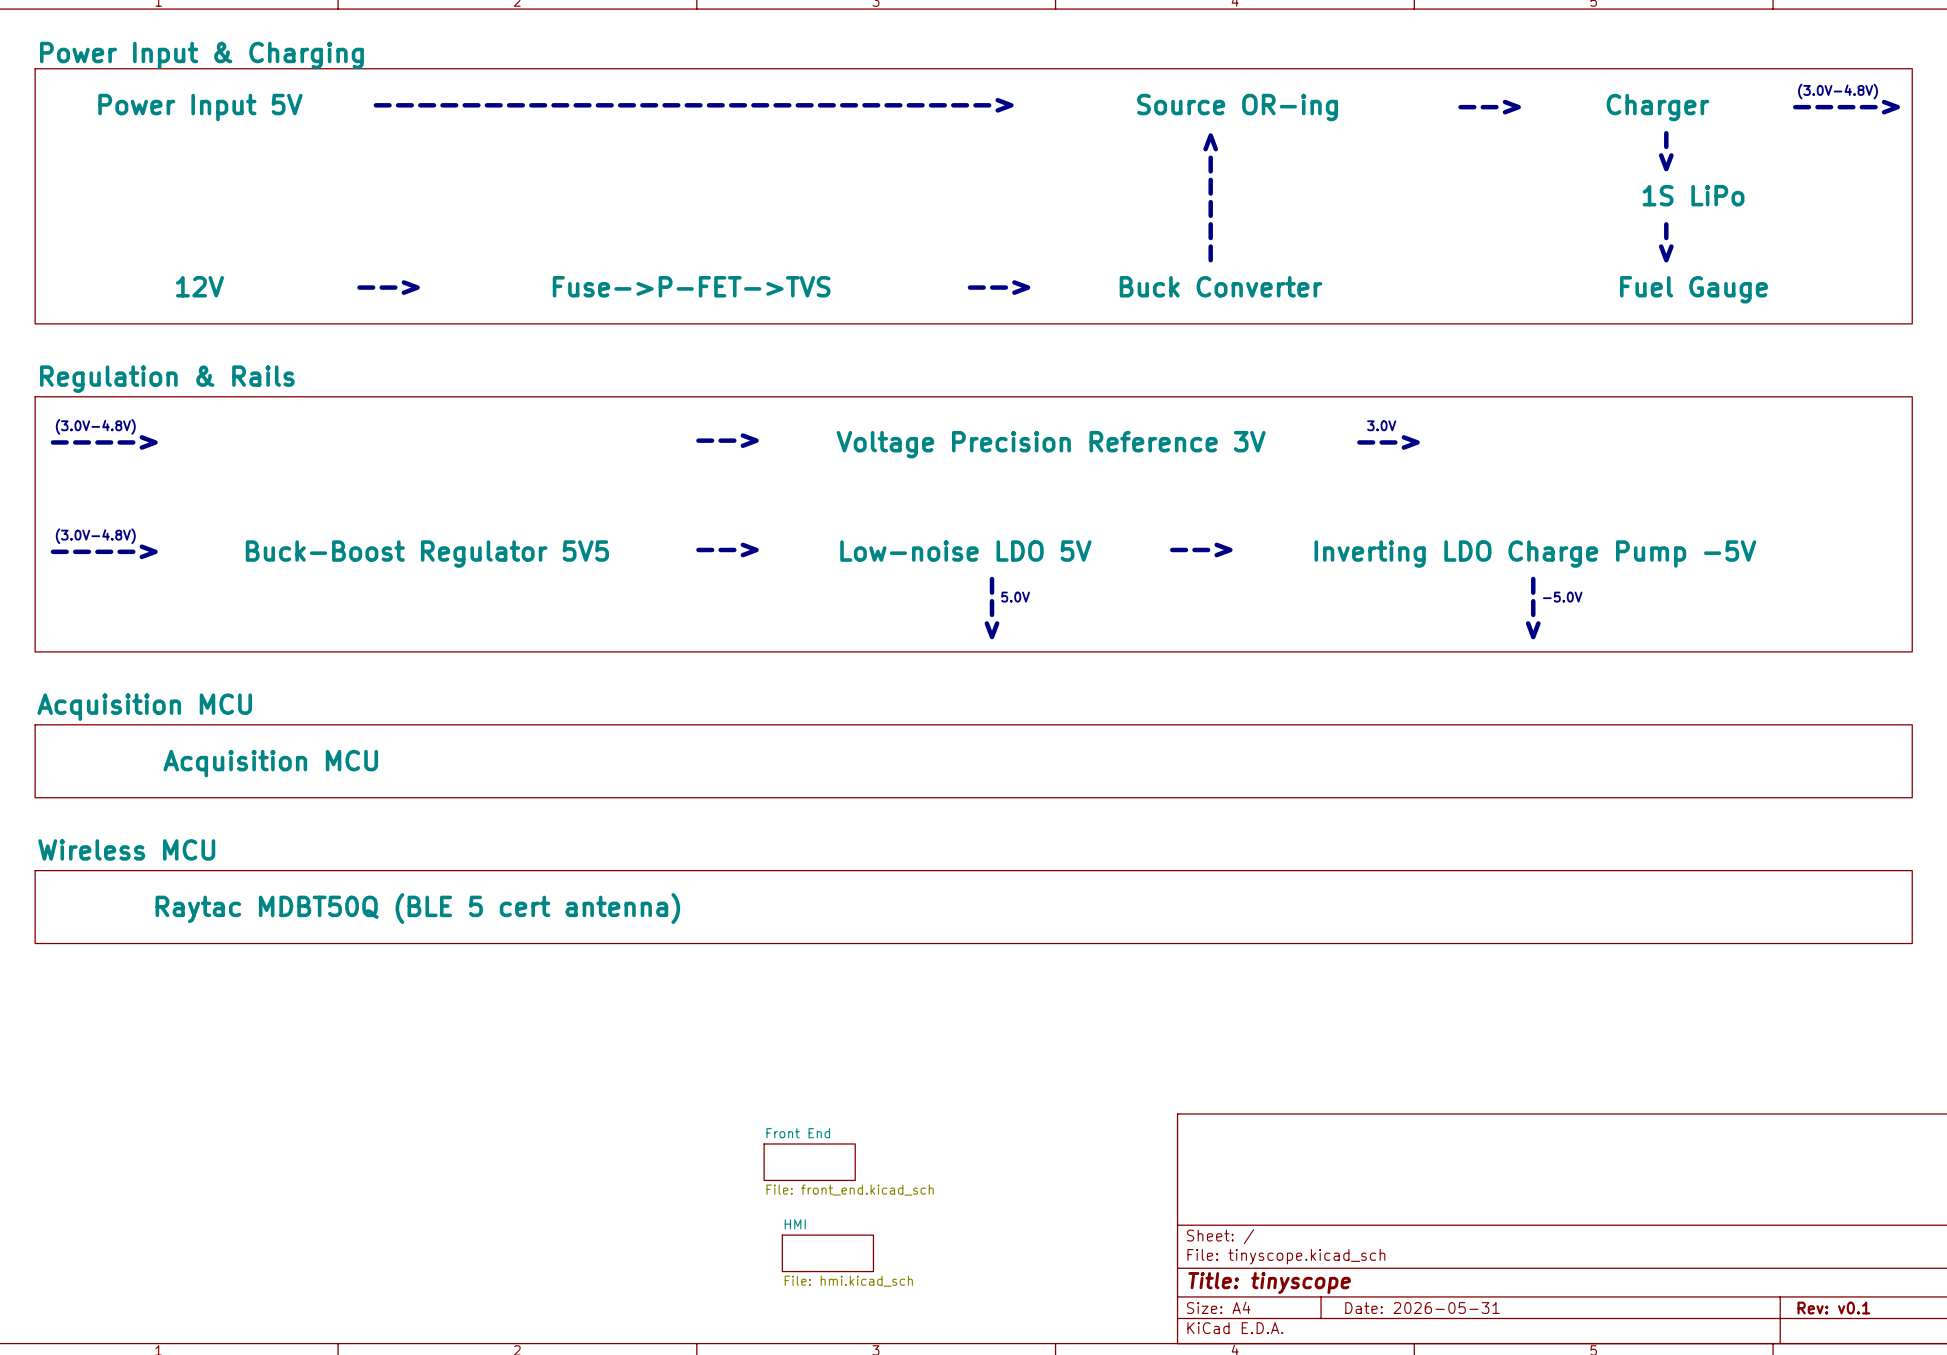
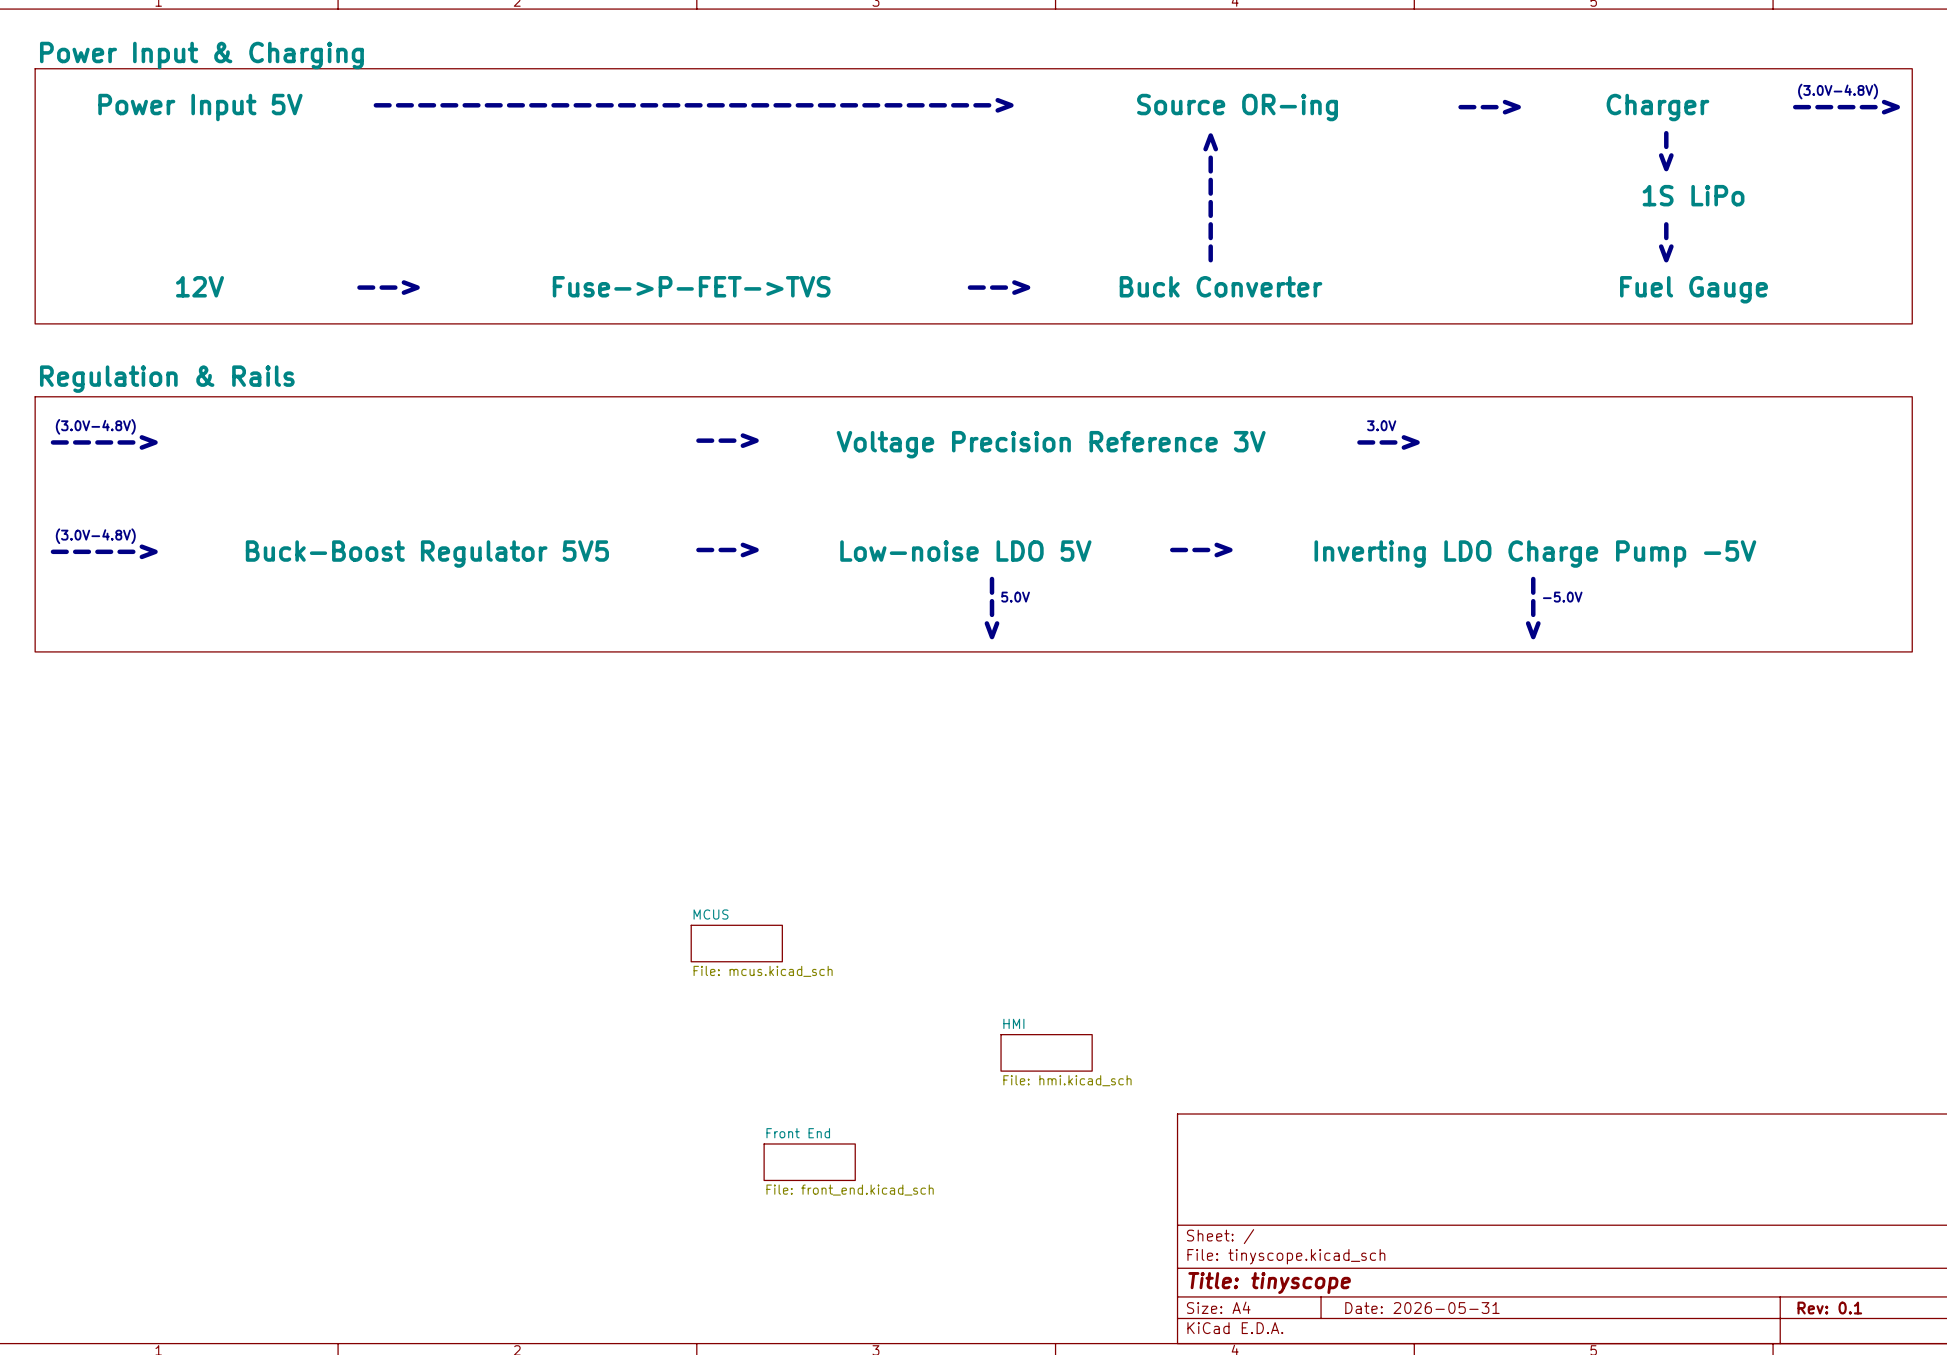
sheet Acquisition MCU: (973, 761) -> none
sheet Wireless MCU: (973, 907) -> none
sheet MCUS: none -> File: mcus.kicad_sch (736, 943)
sheet HMI: none -> File: hmi.kicad_sch (1046, 1052)
sheet HMI: File: hmi.kicad_sch (827, 1253) -> none
title block: Rev: v0.1 (1833, 1308) -> Rev: 0.1 (1829, 1308)

